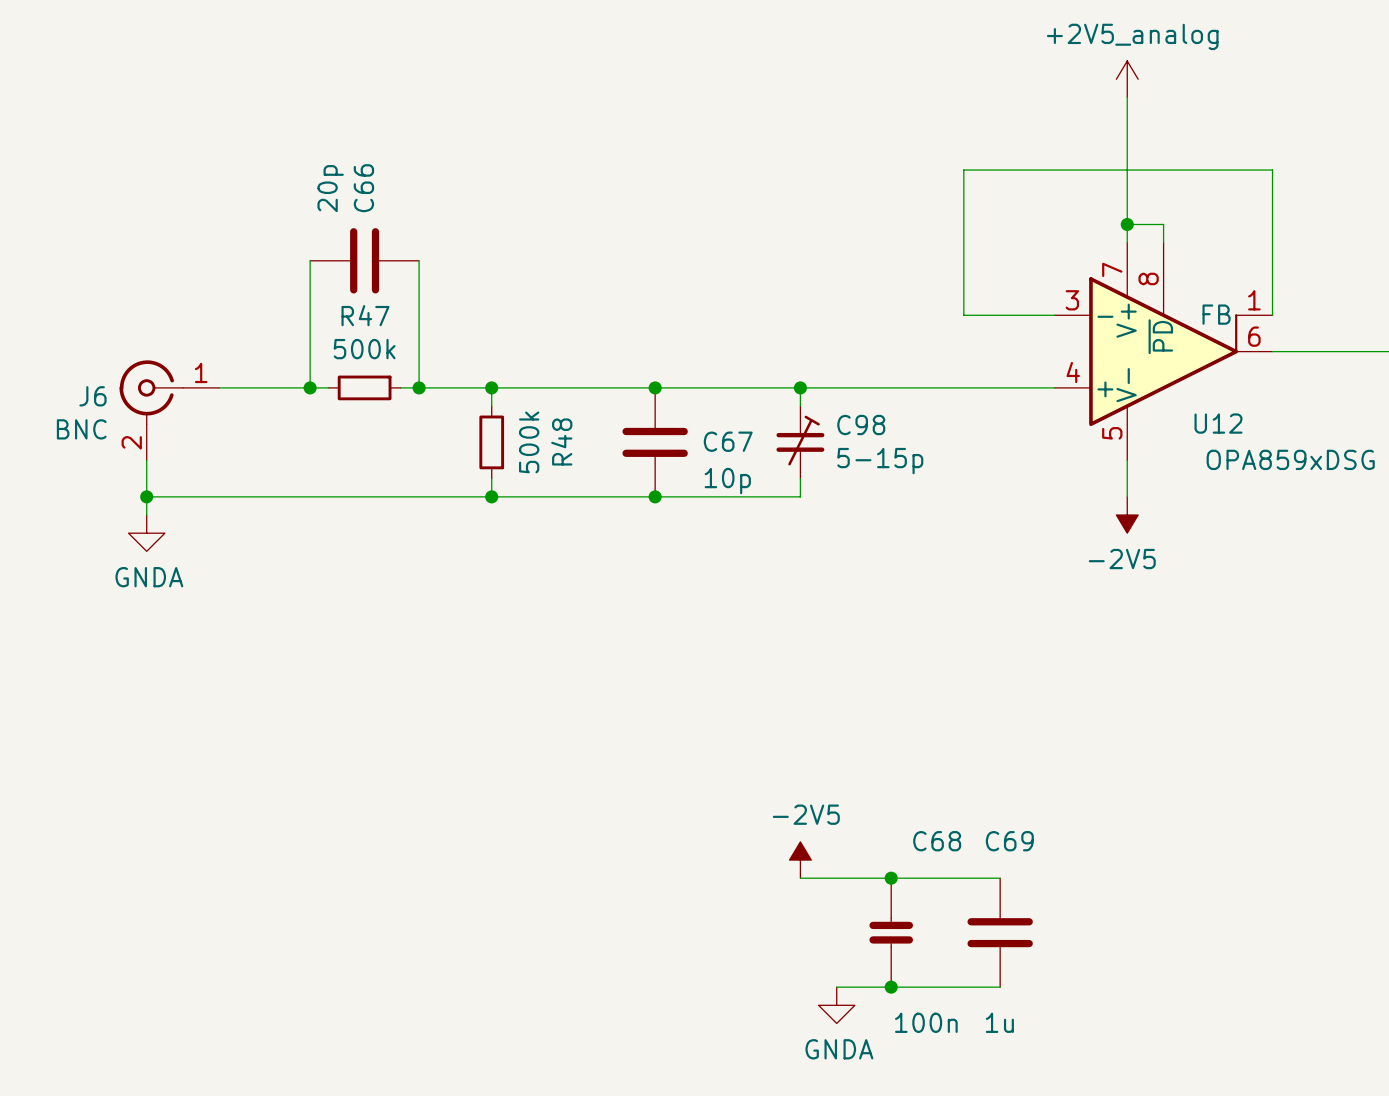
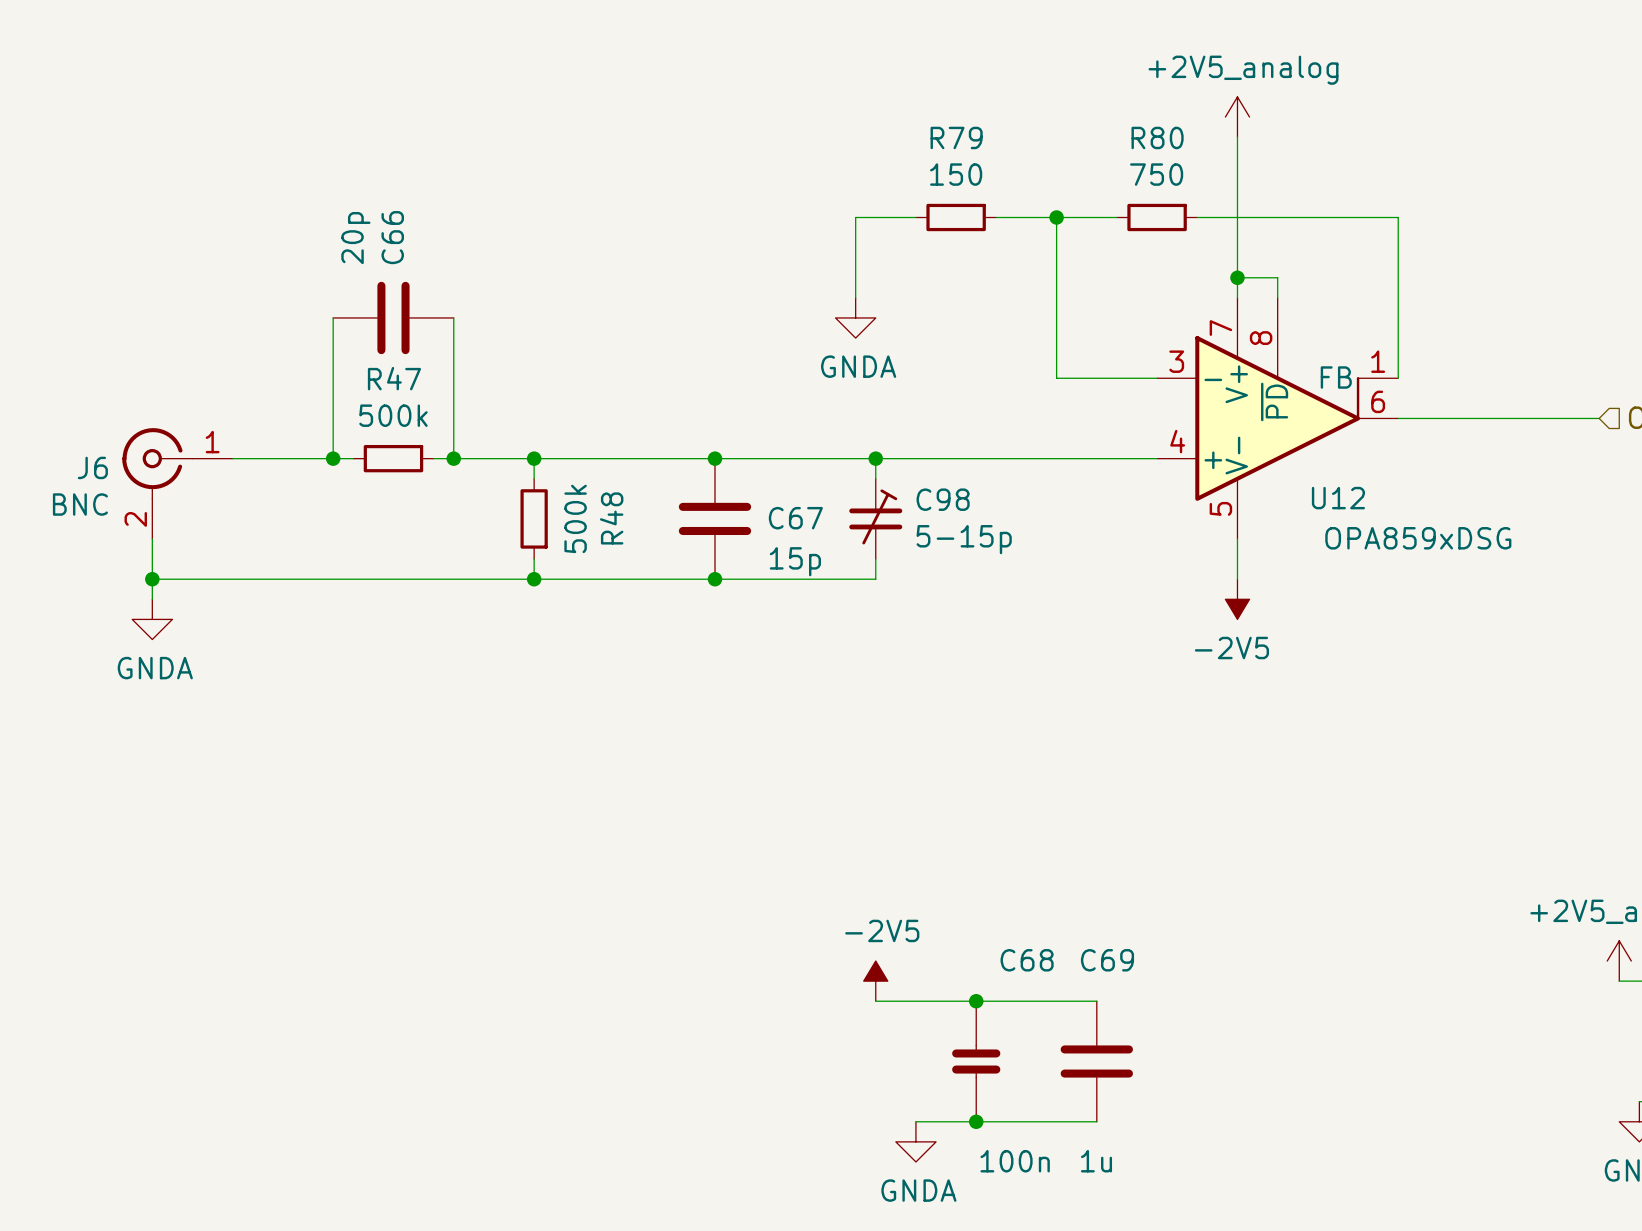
wire: none -> (915, 217) (855, 217) (855, 297)
R79: none -> 150 (956, 217)
wire: none -> (996, 217) (1056, 217)
junction: none -> (1056, 217)
wire: (1018, 170) (1090, 170) -> none
R80: none -> 750 (1157, 217)
power symbol: none -> GNDA (855, 317)
C67 value: 10p (727, 481) -> 15p (795, 561)

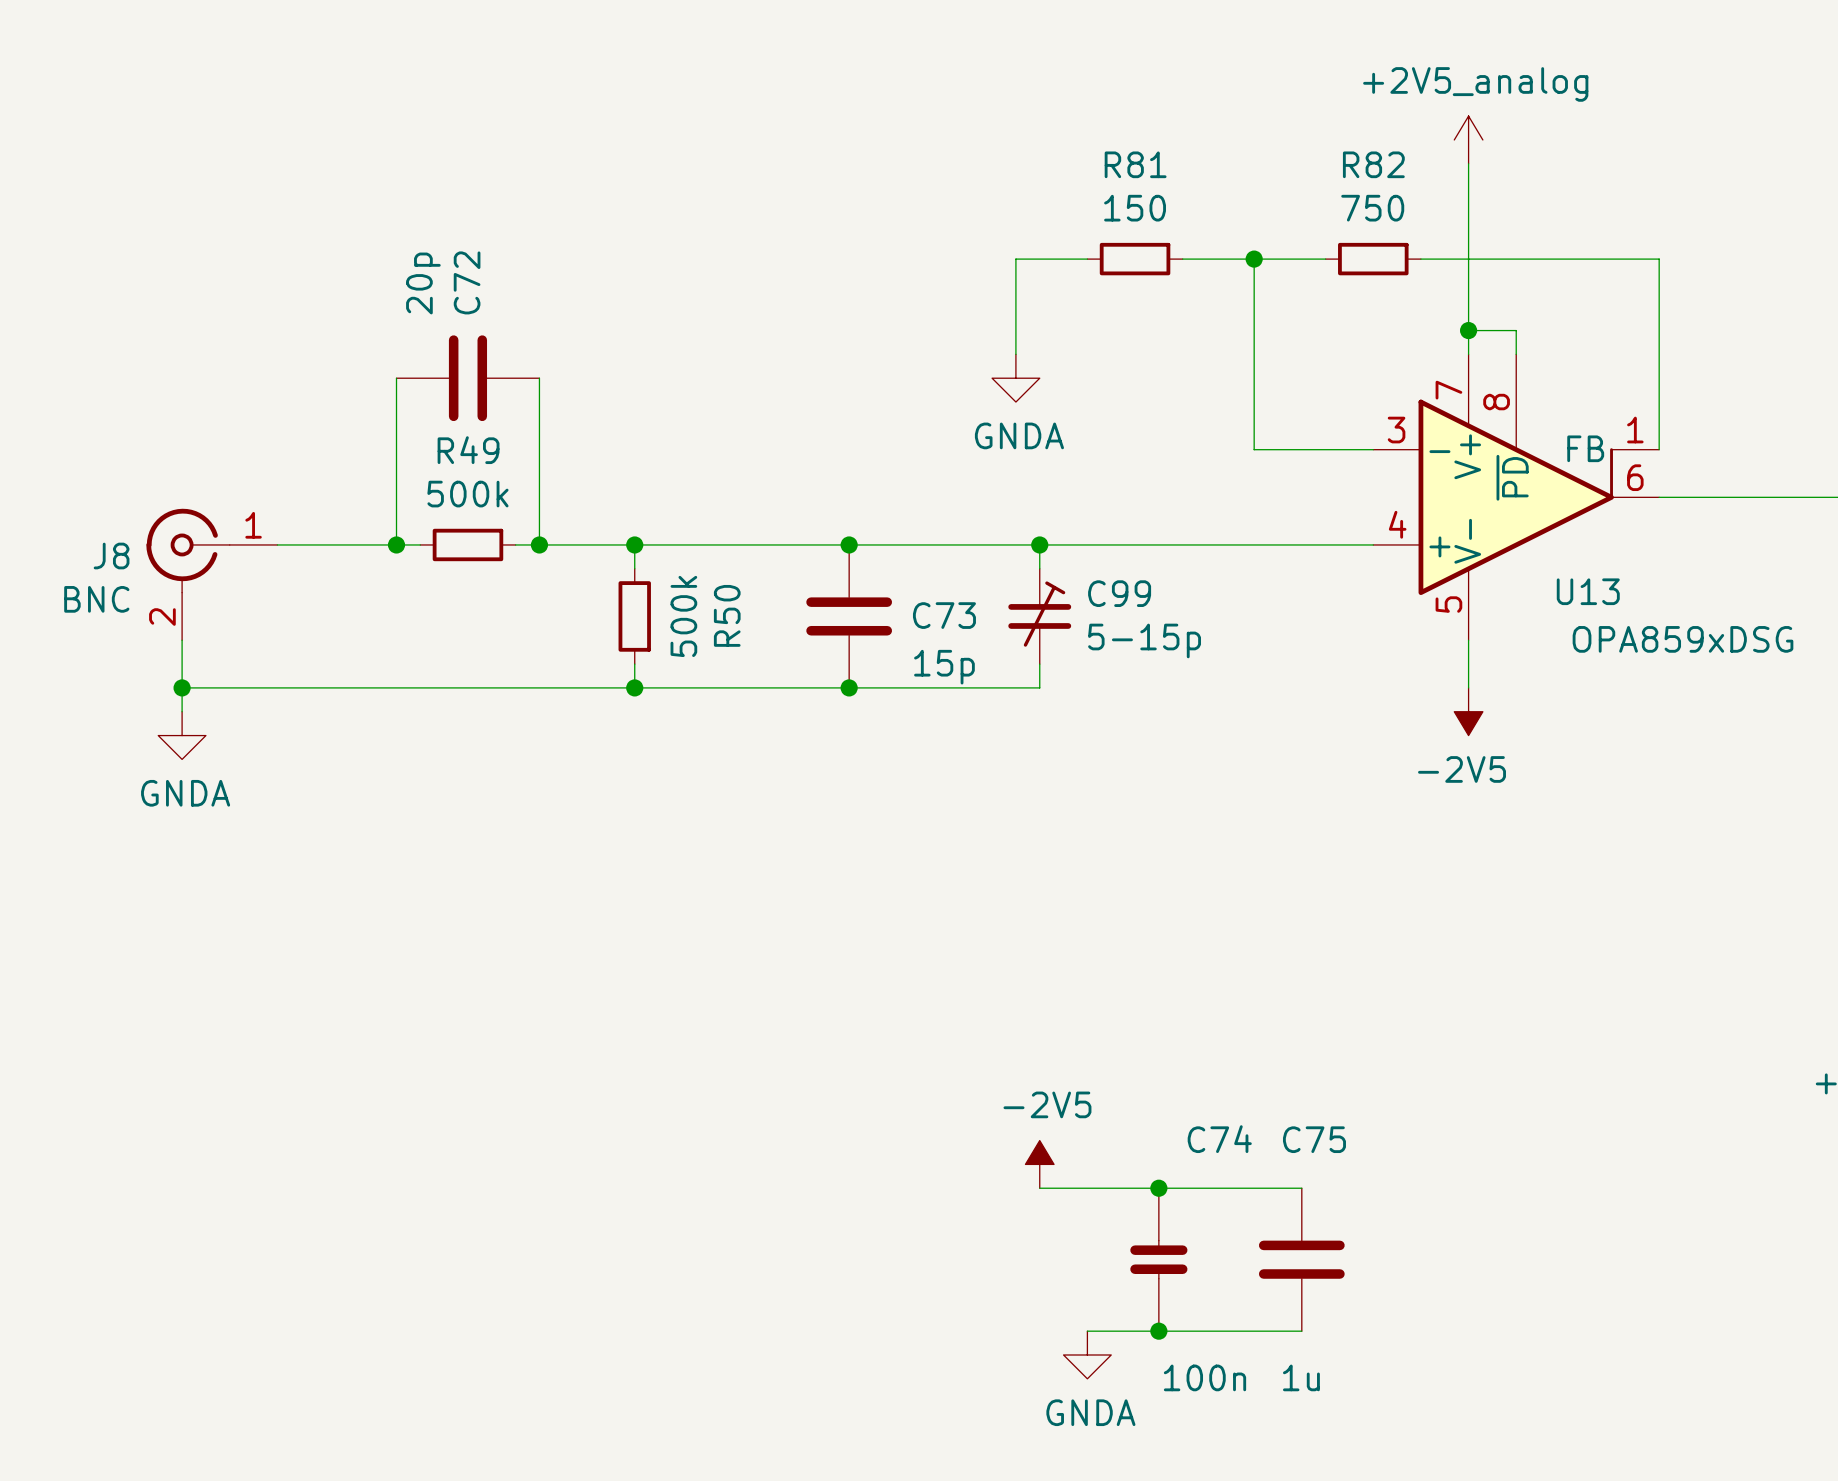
R79 name: R79 (956, 137) -> R81 (1135, 164)
R80 name: R80 (1157, 137) -> R82 (1373, 164)
C66 name: C66 (392, 237) -> C72 (467, 282)
R47 name: R47 (394, 378) -> R49 (468, 450)
J6 name: J6 (92, 467) -> J8 (111, 556)
U12 name: U12 (1338, 498) -> U13 (1588, 591)
C98 name: C98 (943, 499) -> C99 (1119, 593)
R48 name: R48 (611, 518) -> R50 (727, 615)
C67 name: C67 (795, 518) -> C73 (944, 615)
C68 name: C68 (1027, 960) -> C74 (1219, 1139)
C69 name: C69 (1107, 960) -> C75 (1314, 1139)

